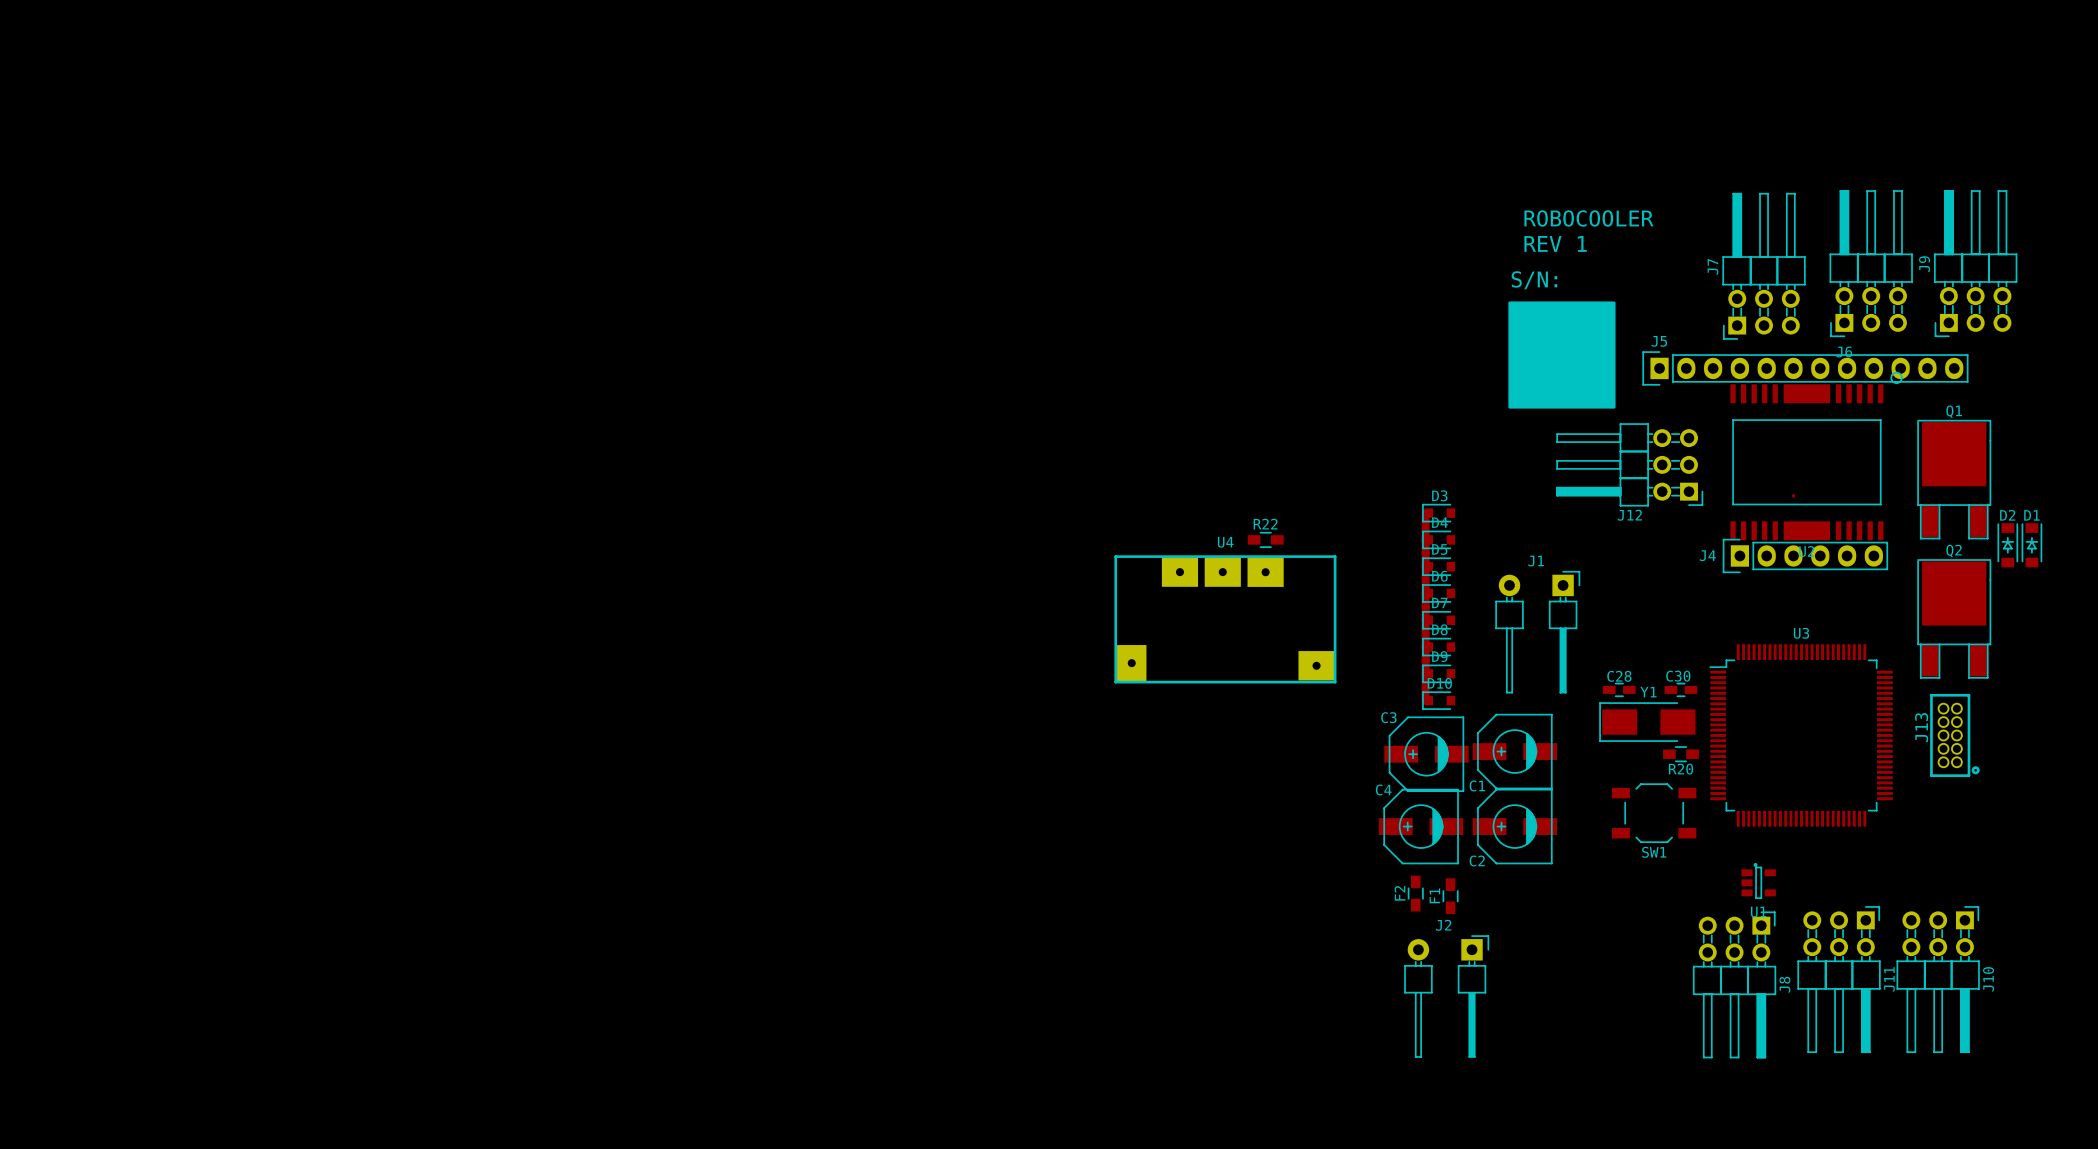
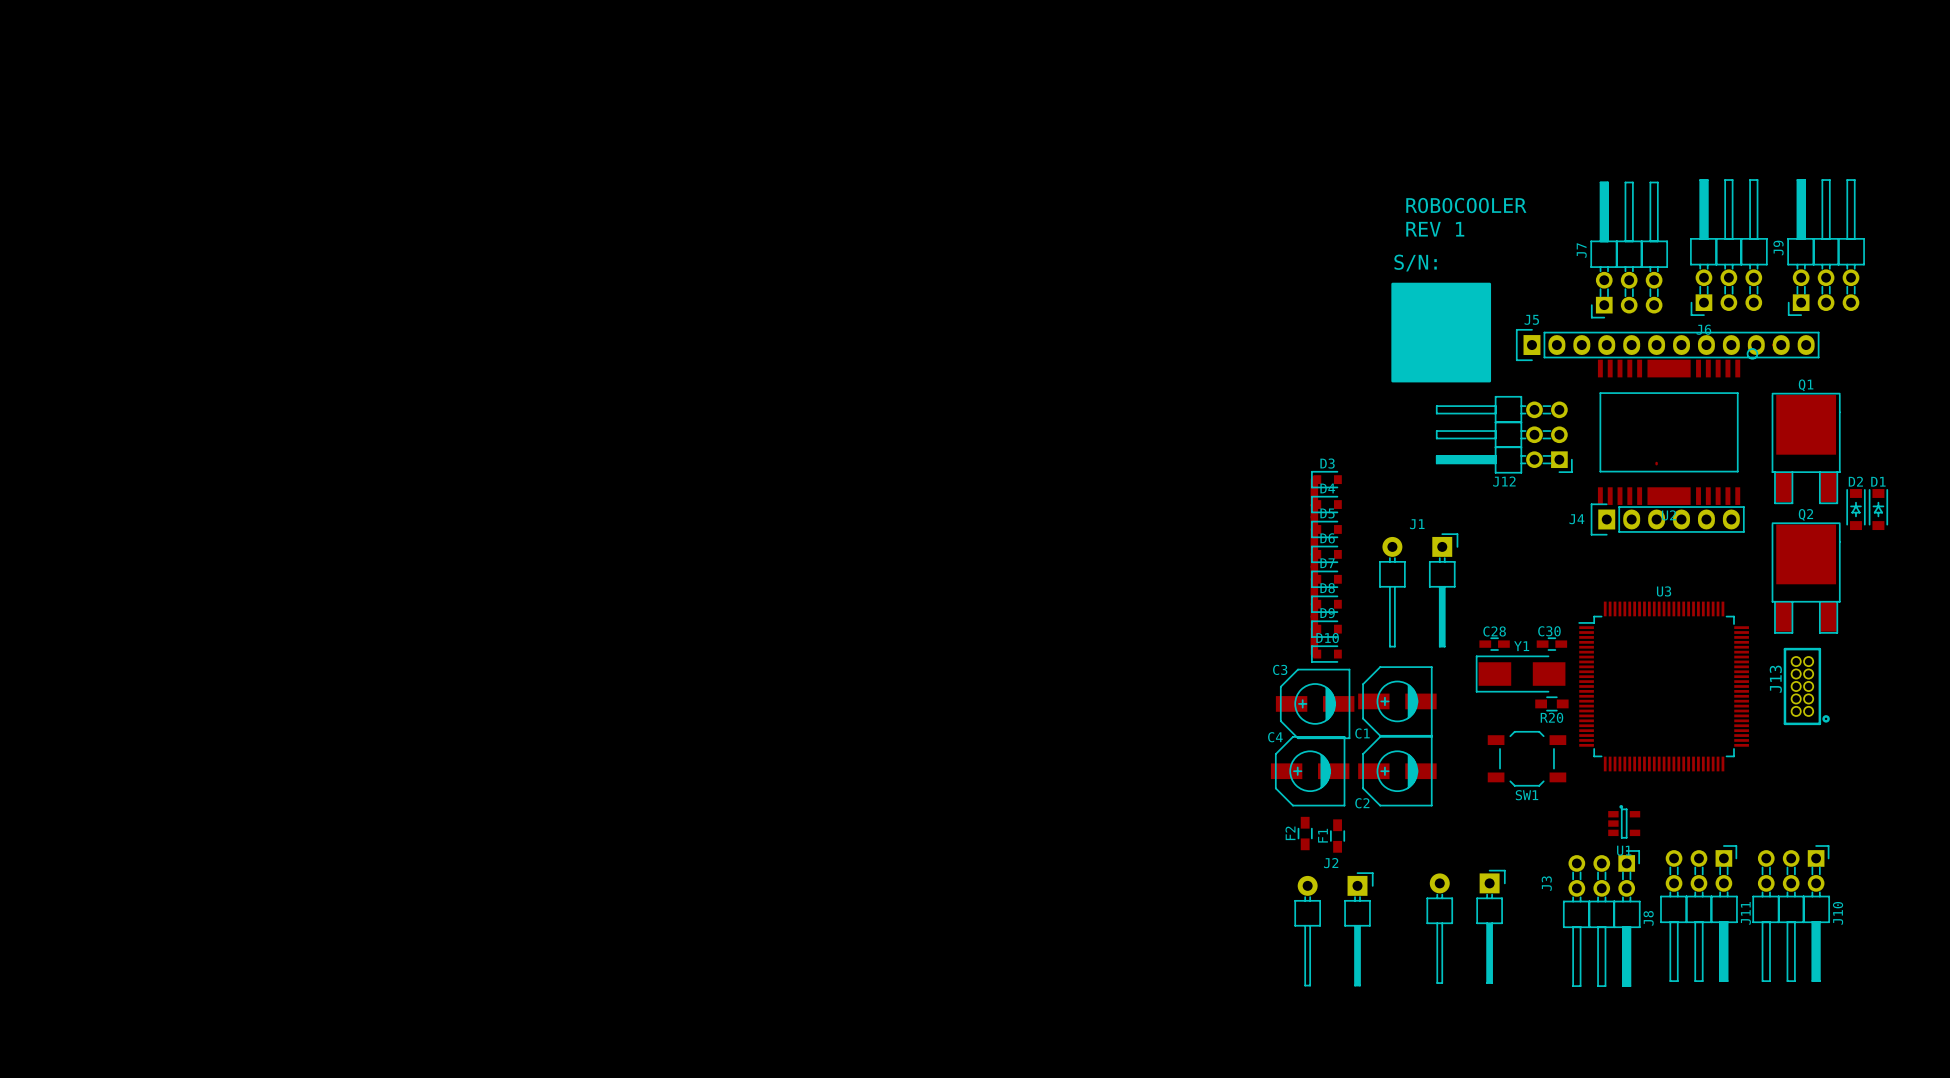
R22: (1265, 539) -> none
U4: (1225, 619) -> none
J3: none -> (1466, 926)

